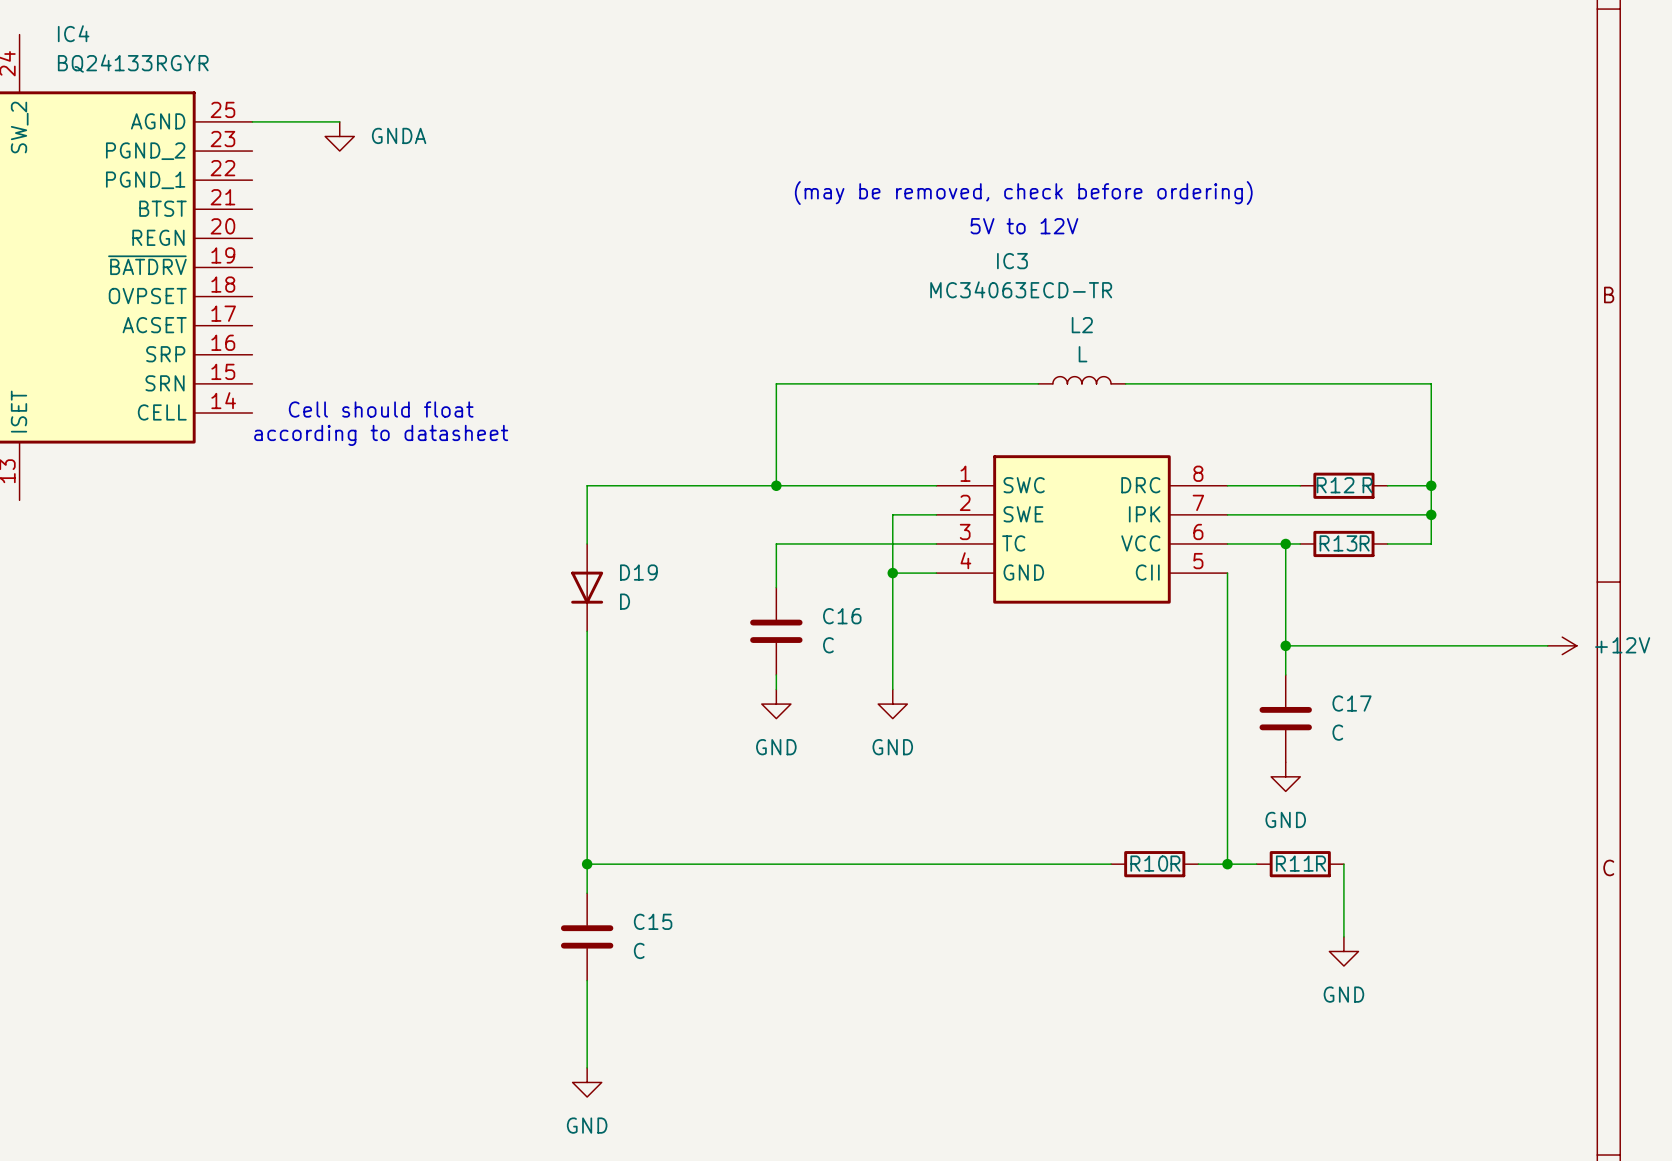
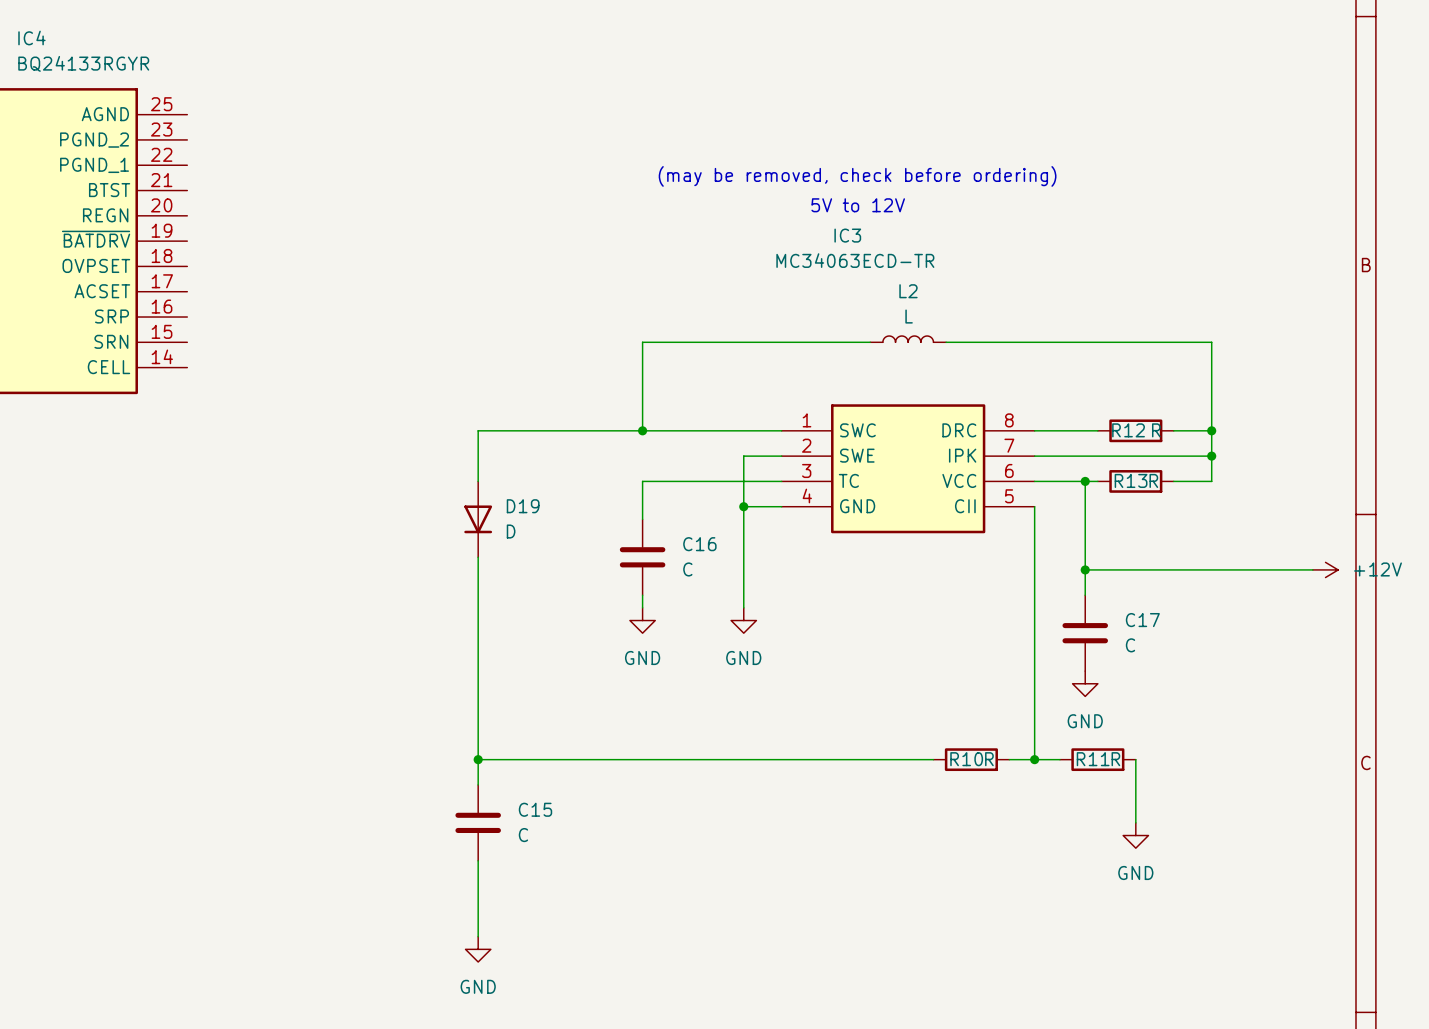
wire: (252, 121) (339, 121) -> none
power symbol: GNDA (339, 136) -> none
text: Cell should float (381, 409) -> none
text: according to datasheet (381, 435) -> none

